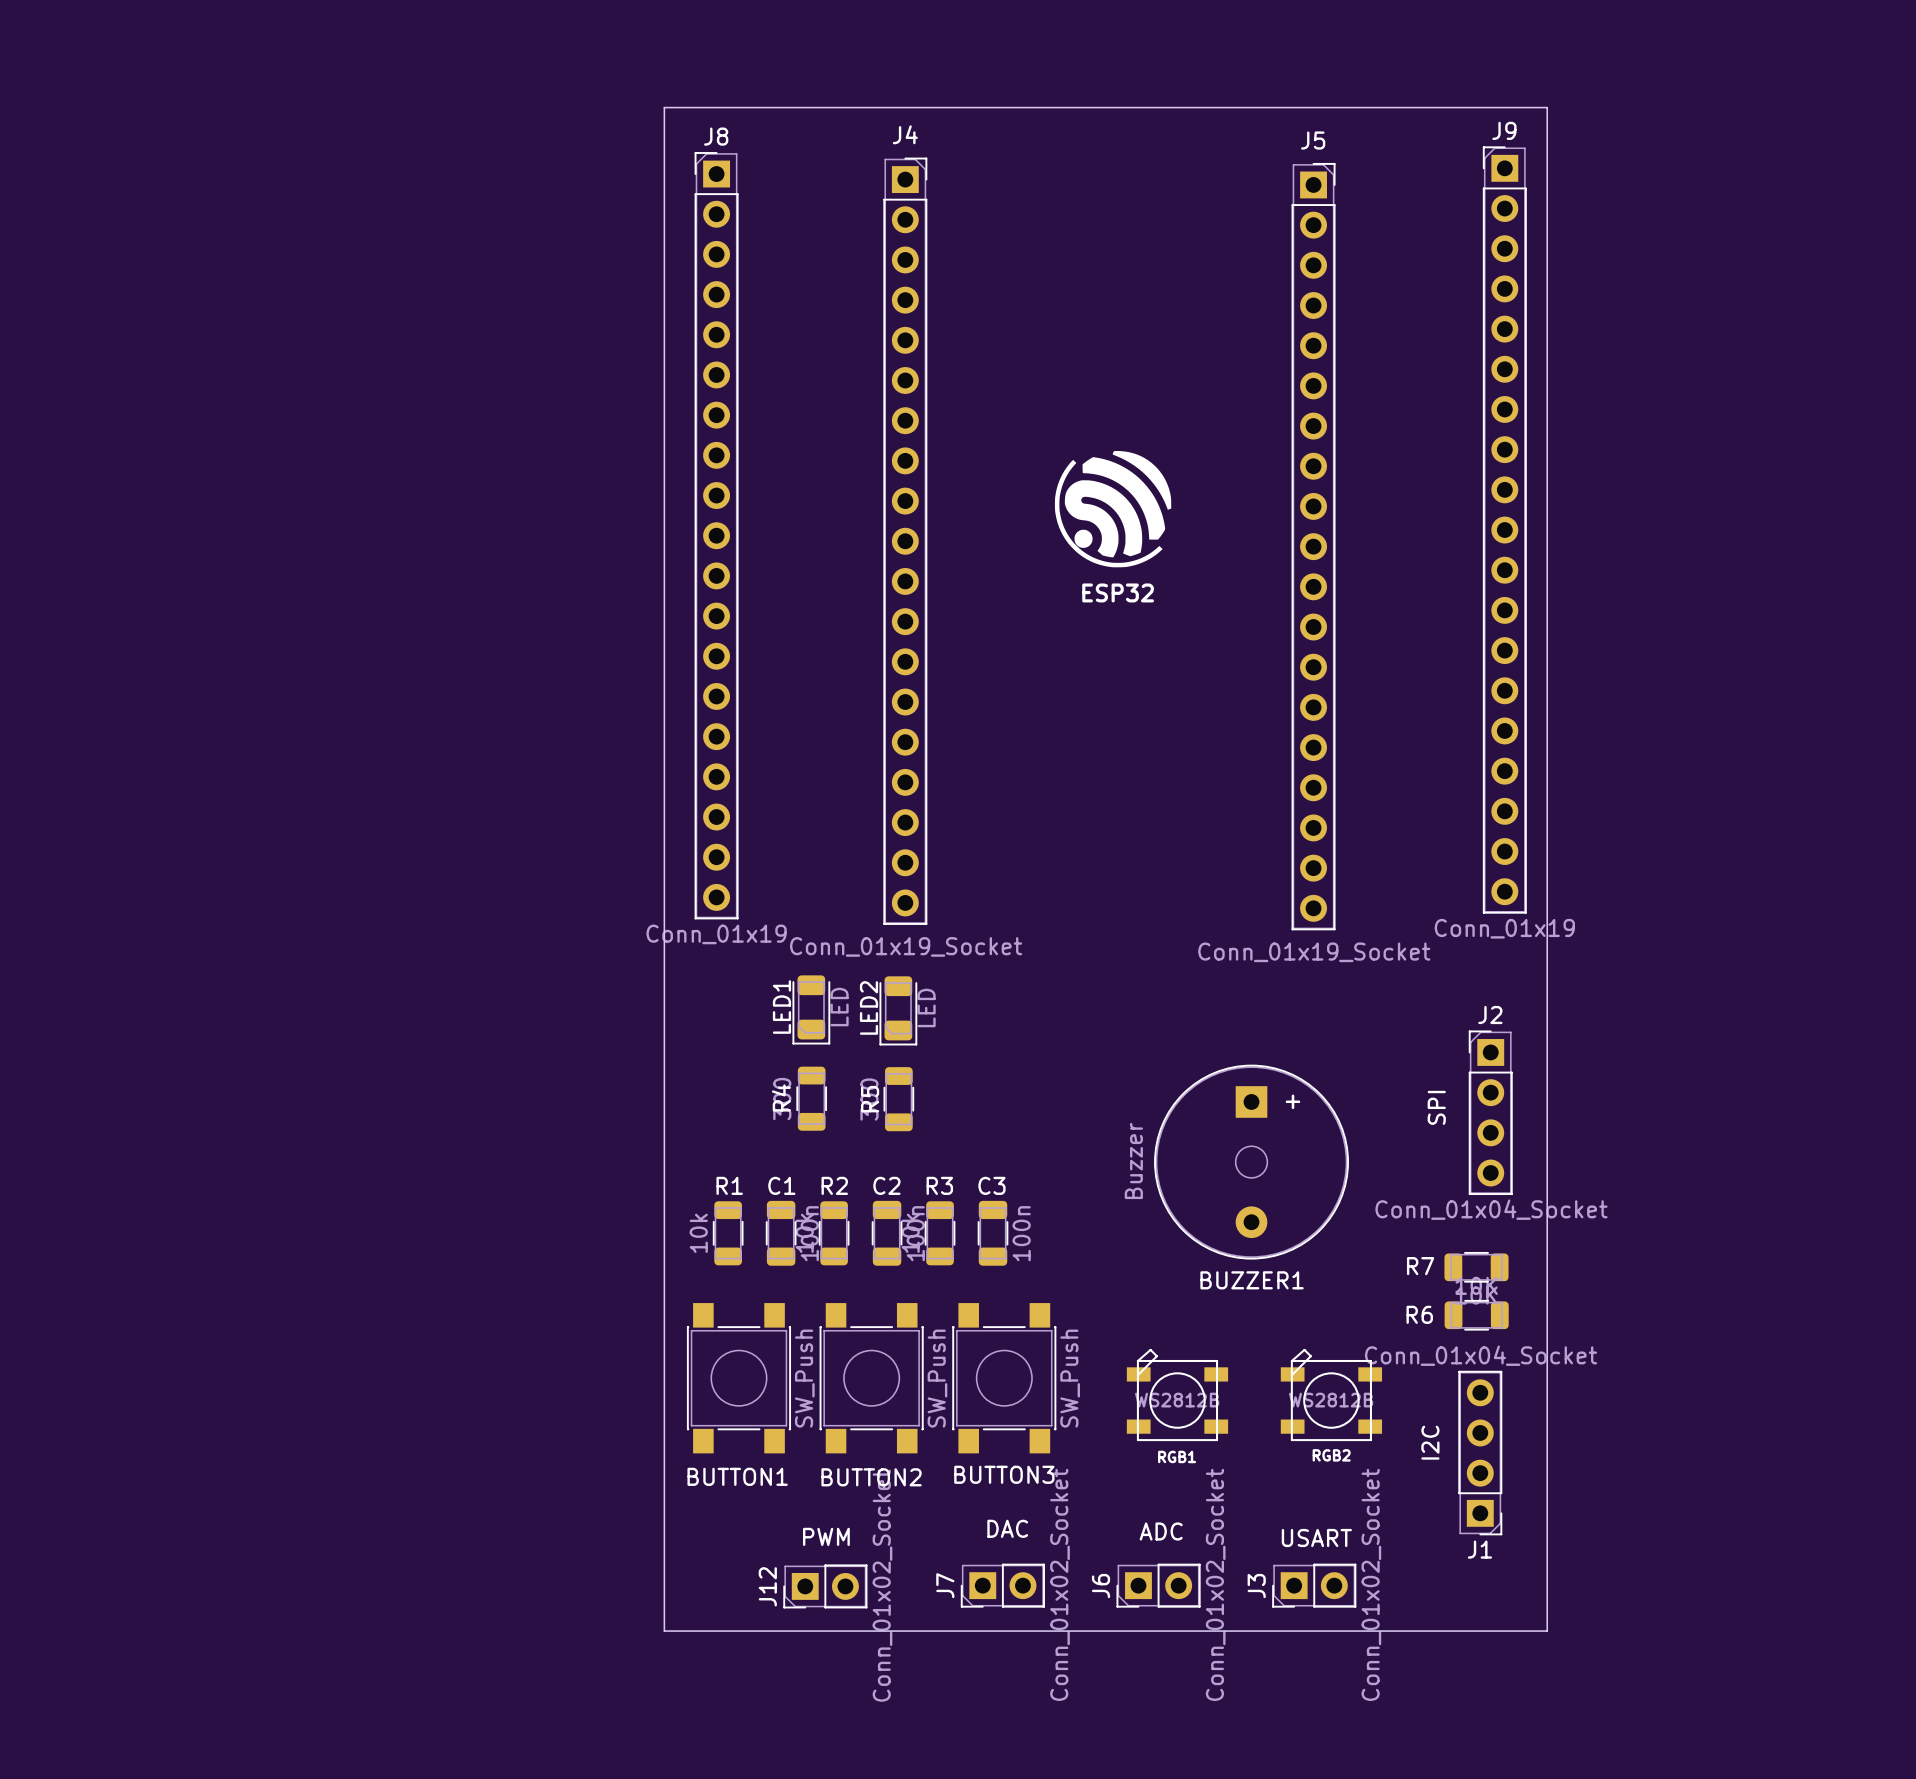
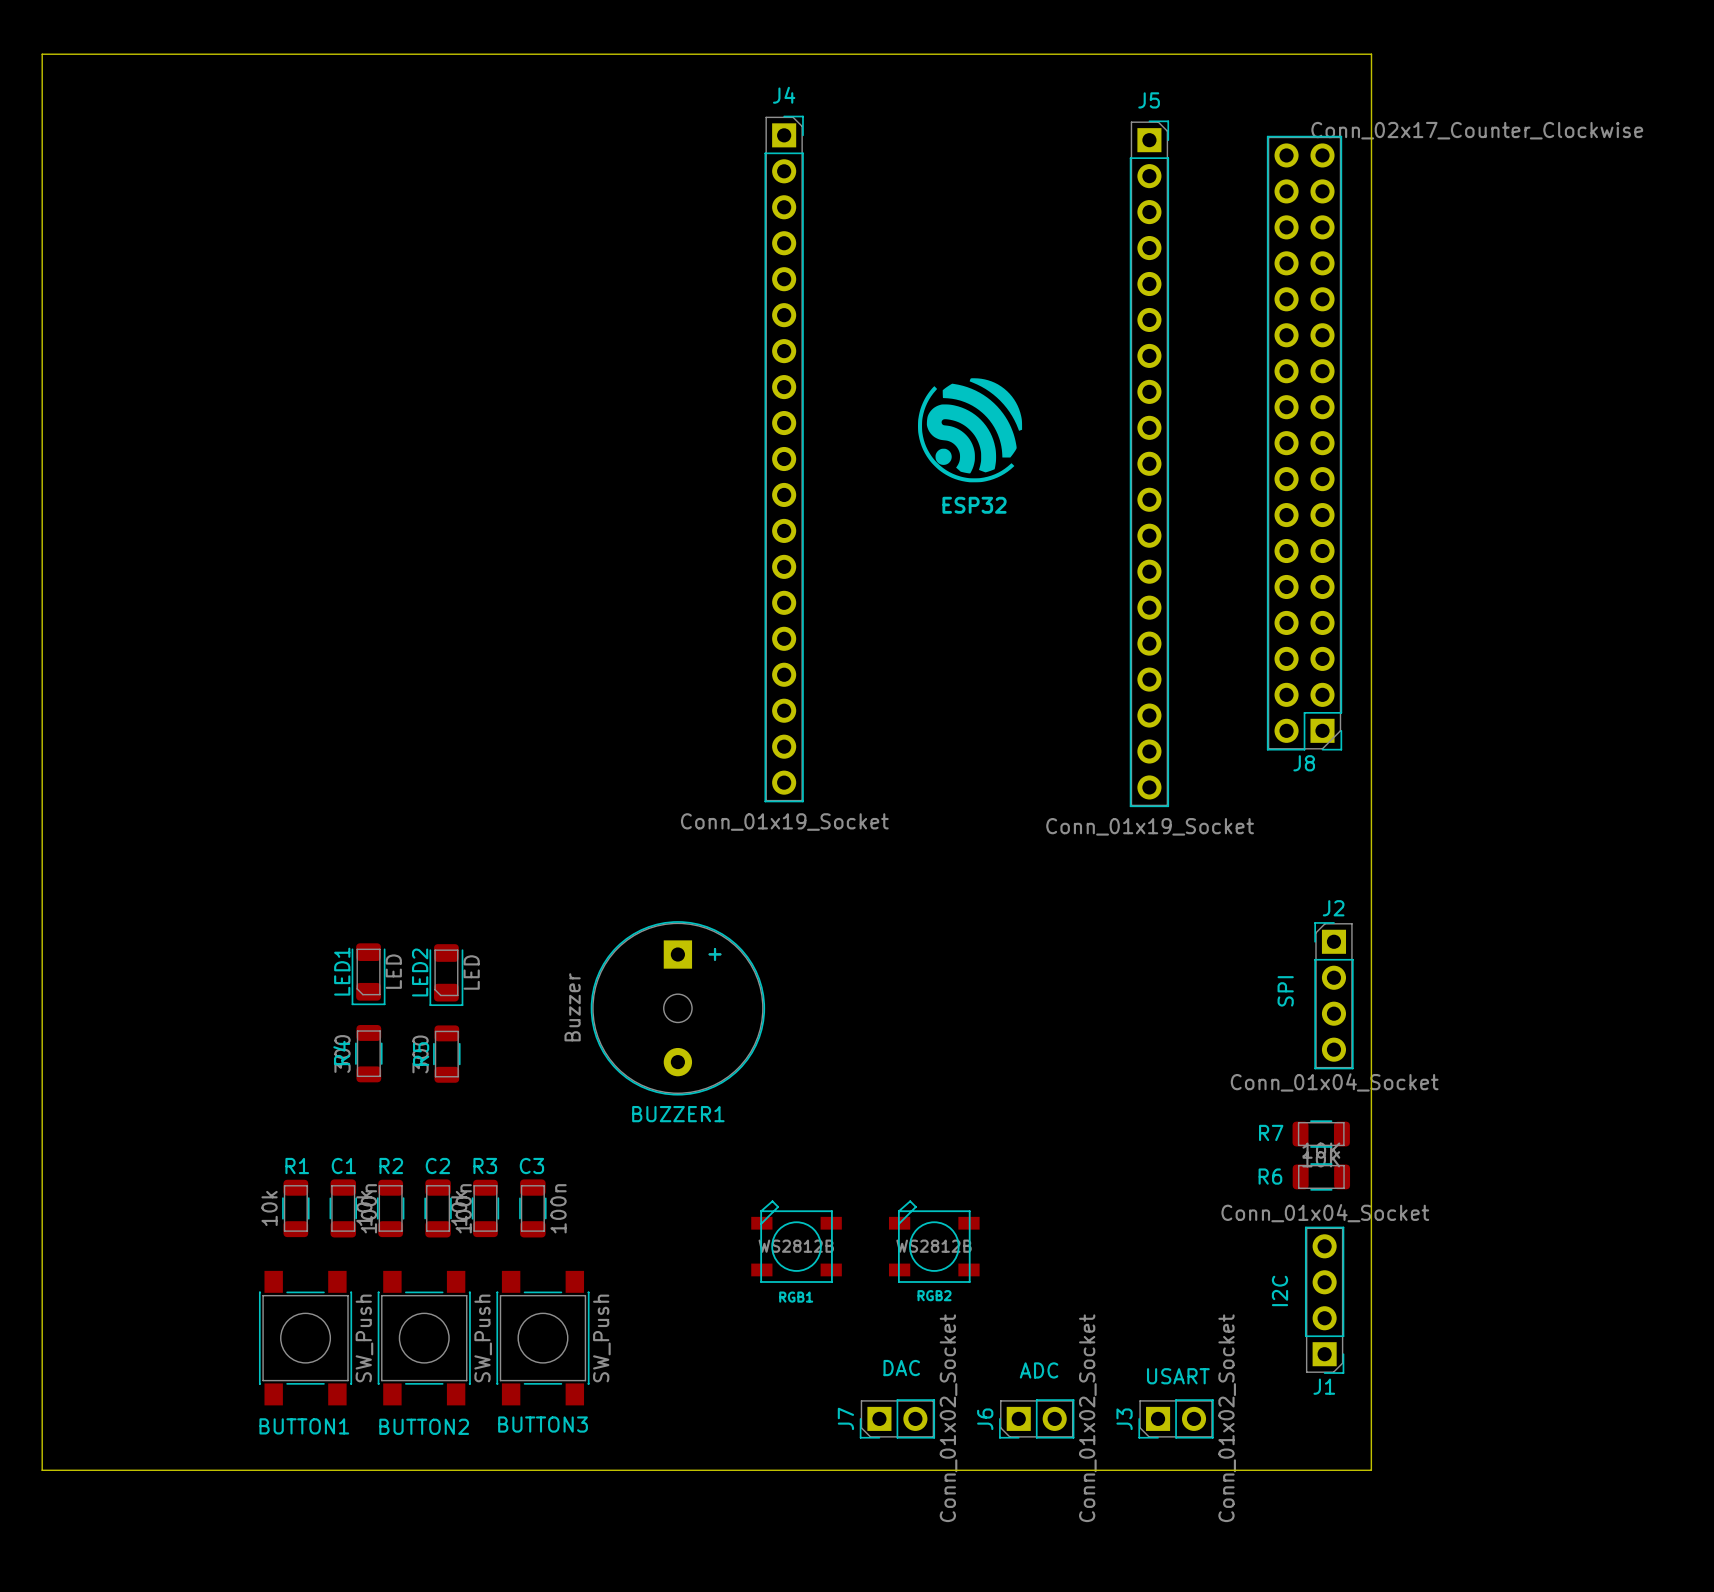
board edge: (664, 107) (1547, 107) (1547, 1631) (664, 1631) (664, 107) -> (42, 54) (42, 1470) (1371, 1470) (1371, 54) (42, 54)
J8 name position: J8 (716, 136) -> J8 (1304, 763)
J8 footprint: [694, 152, 739, 920] -> [1266, 135, 1343, 751]
drawing position: (1113, 509) -> (970, 430)
J9: Conn_01x19 (1504, 530) -> none
J4 position: (905, 541) -> (784, 458)
J5 position: (1313, 546) -> (1149, 463)
text position: ESP32 (1118, 592) -> ESP32 (974, 505)
J8 value: Conn_01x19 (716, 934) -> Conn_02x17_Counter_Clockwise (1477, 130)
LED1 position: (811, 1009) -> (368, 974)
LED2 position: (898, 1010) -> (446, 975)
R4 position: (811, 1098) -> (368, 1053)
R5 position: (898, 1099) -> (446, 1054)
BUZZER1 position: (1251, 1162) -> (677, 1008)
R1 position: (728, 1233) -> (295, 1208)
C1 position: (781, 1233) -> (343, 1208)
R2 position: (834, 1233) -> (390, 1208)
C2 position: (887, 1233) -> (438, 1208)
R3 position: (940, 1233) -> (485, 1208)
C3 position: (993, 1233) -> (532, 1208)
BUTTON1 position: (738, 1378) -> (305, 1338)
BUTTON2 position: (871, 1378) -> (424, 1338)
BUTTON3 position: (1004, 1378) -> (542, 1338)
RGB1 position: (1177, 1394) -> (796, 1241)
RGB2 position: (1331, 1394) -> (934, 1241)
text: PWM (826, 1536) -> none
J12: Conn_01x02_Socket (825, 1586) -> none

